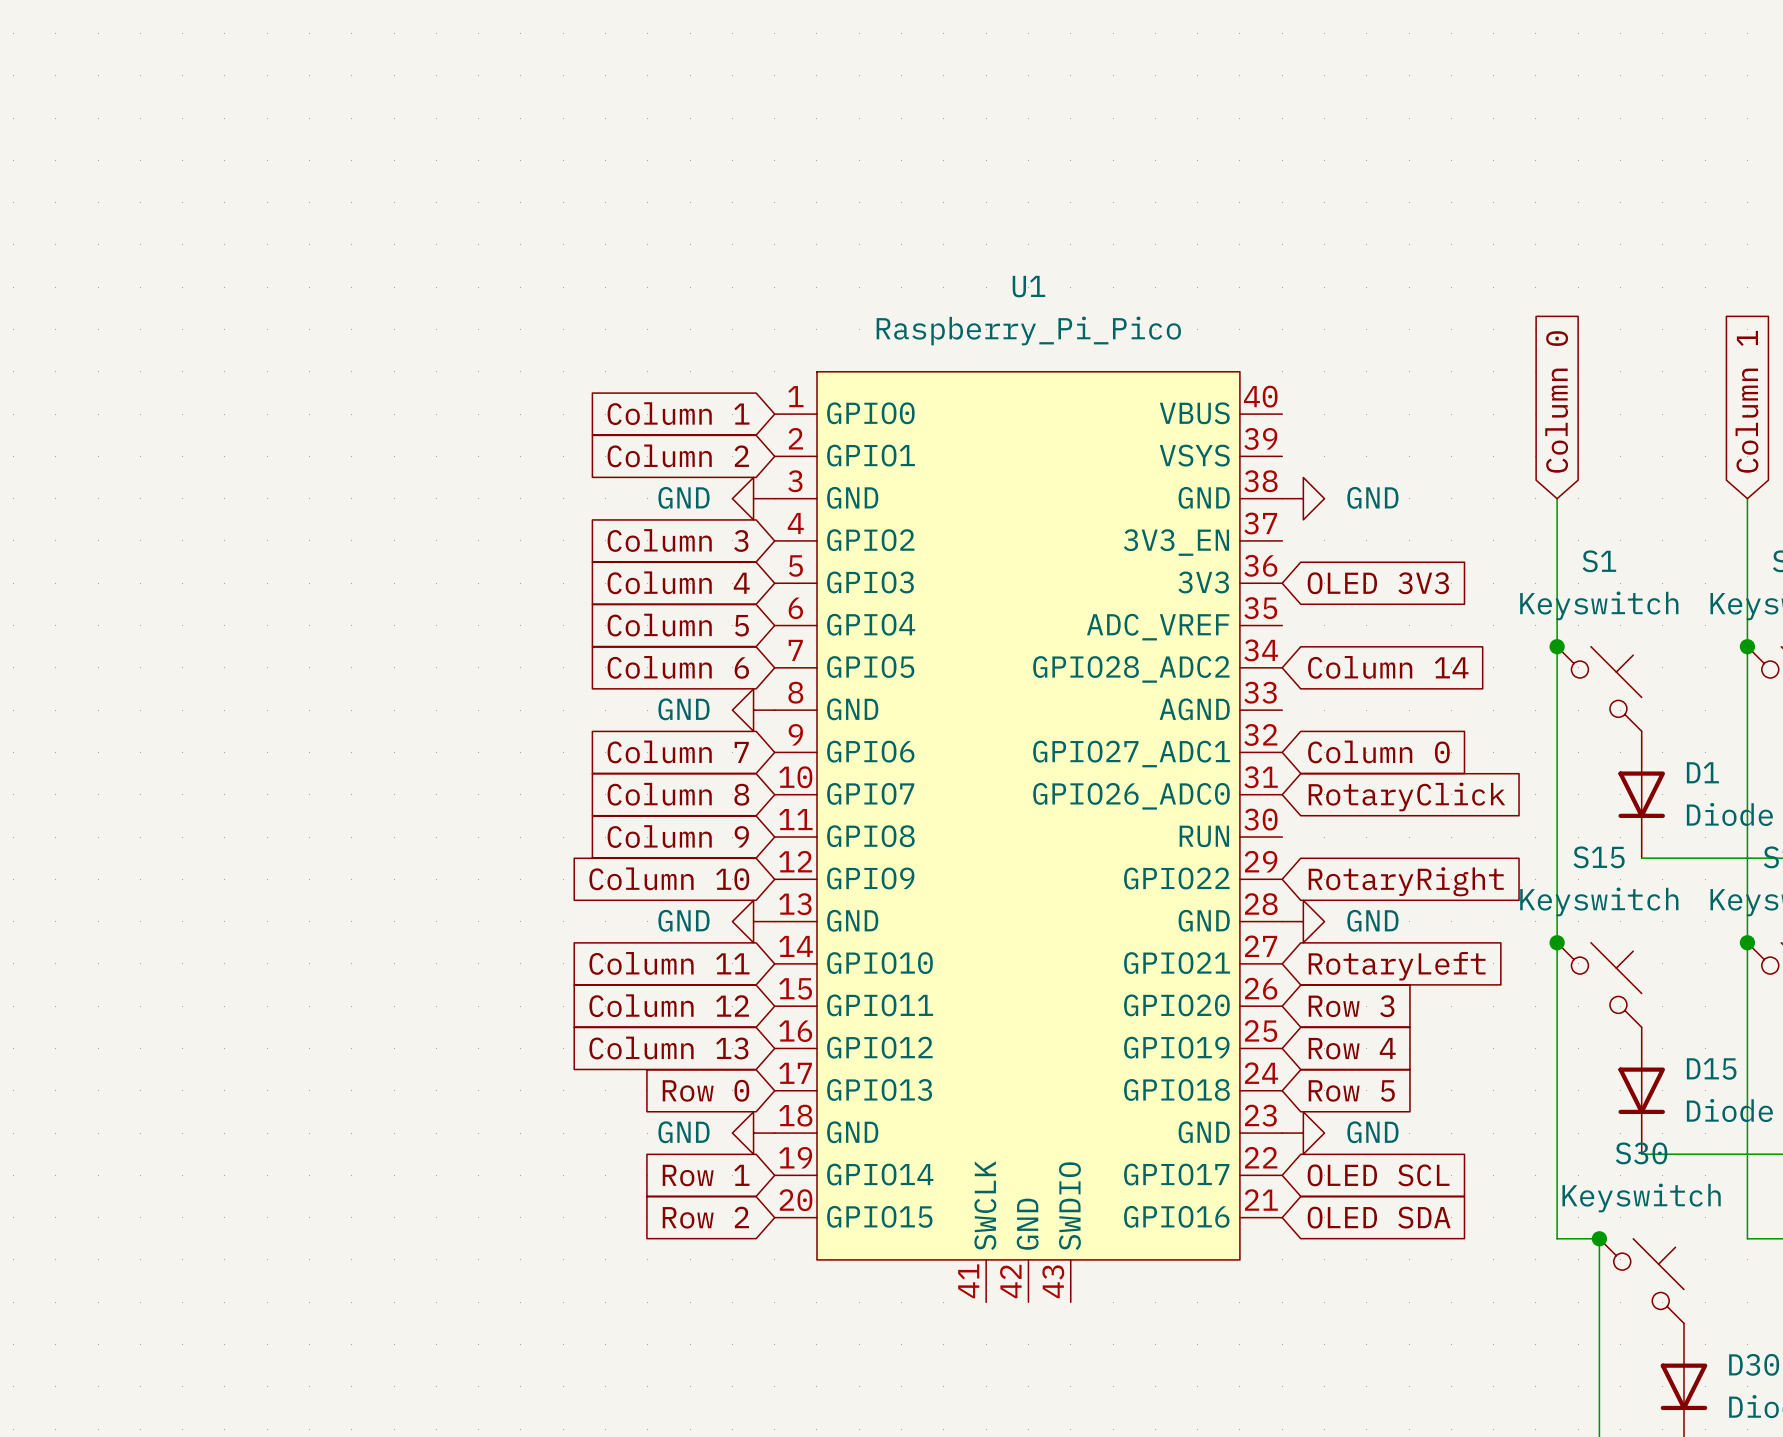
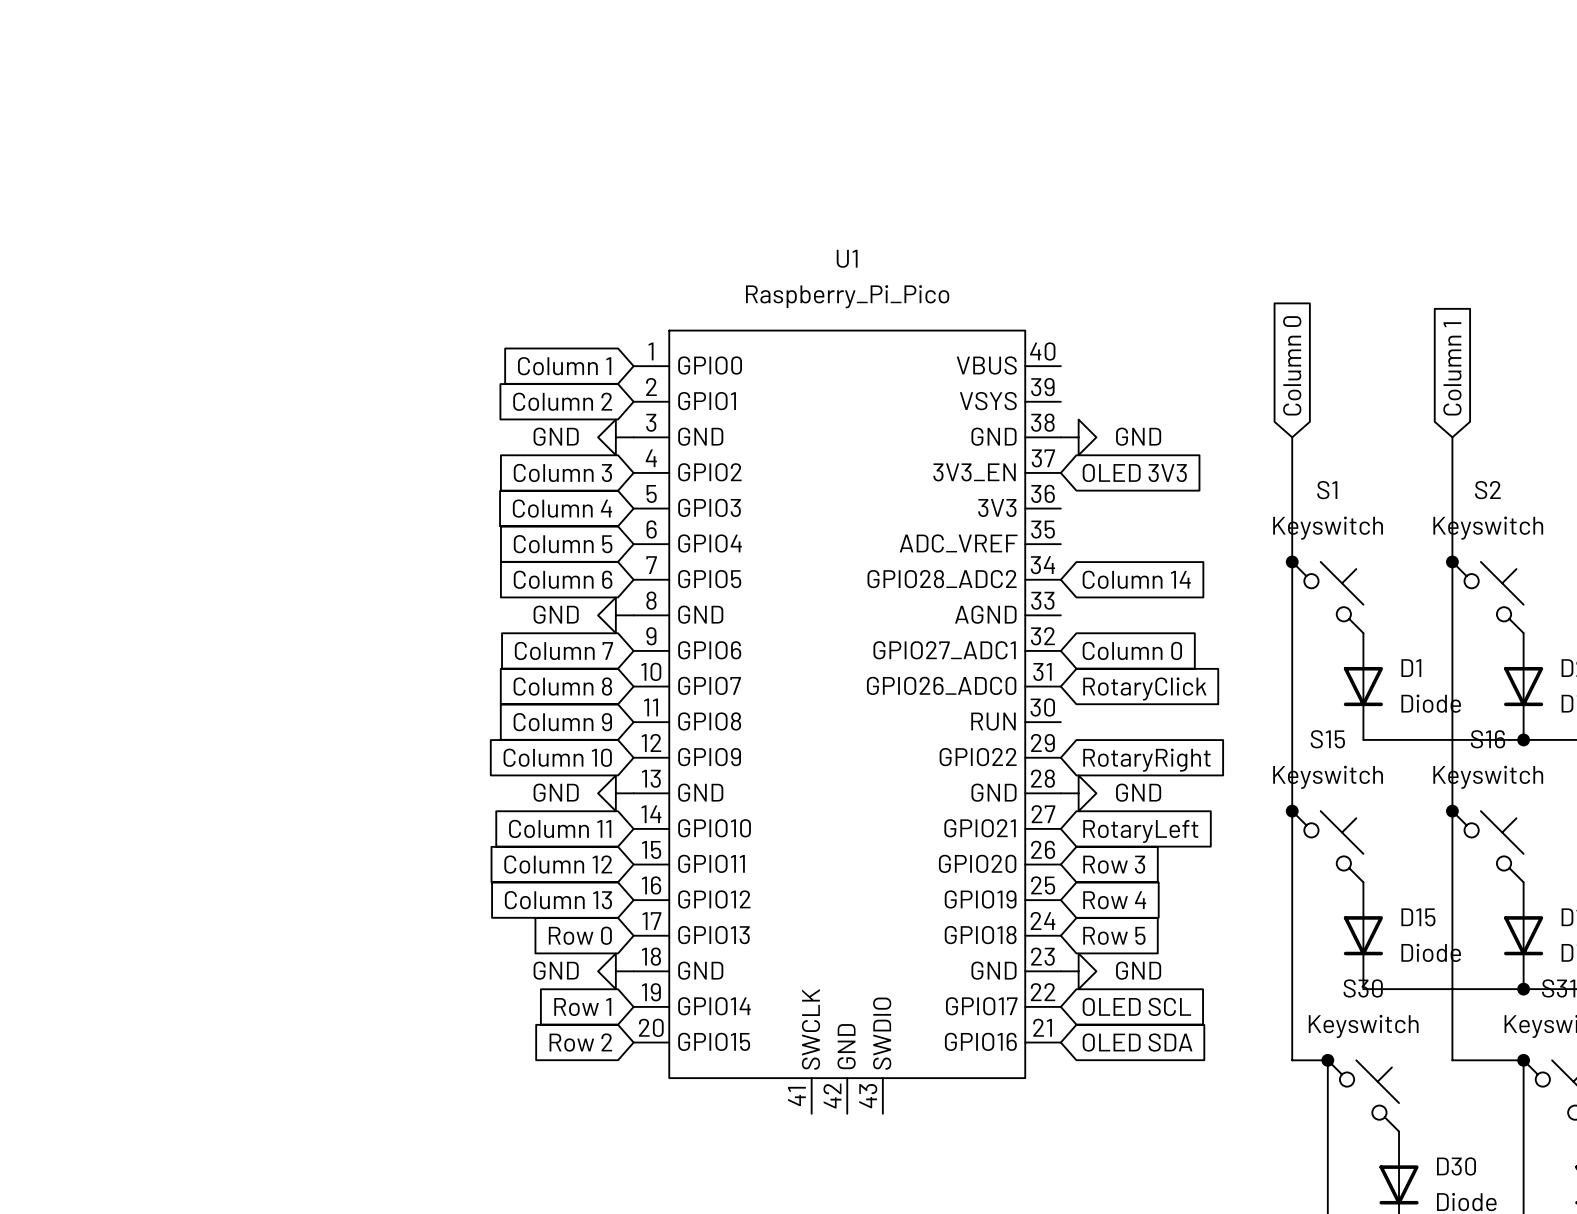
global label position: OLED 3V3 (1378, 583) -> OLED 3V3 (1134, 472)

